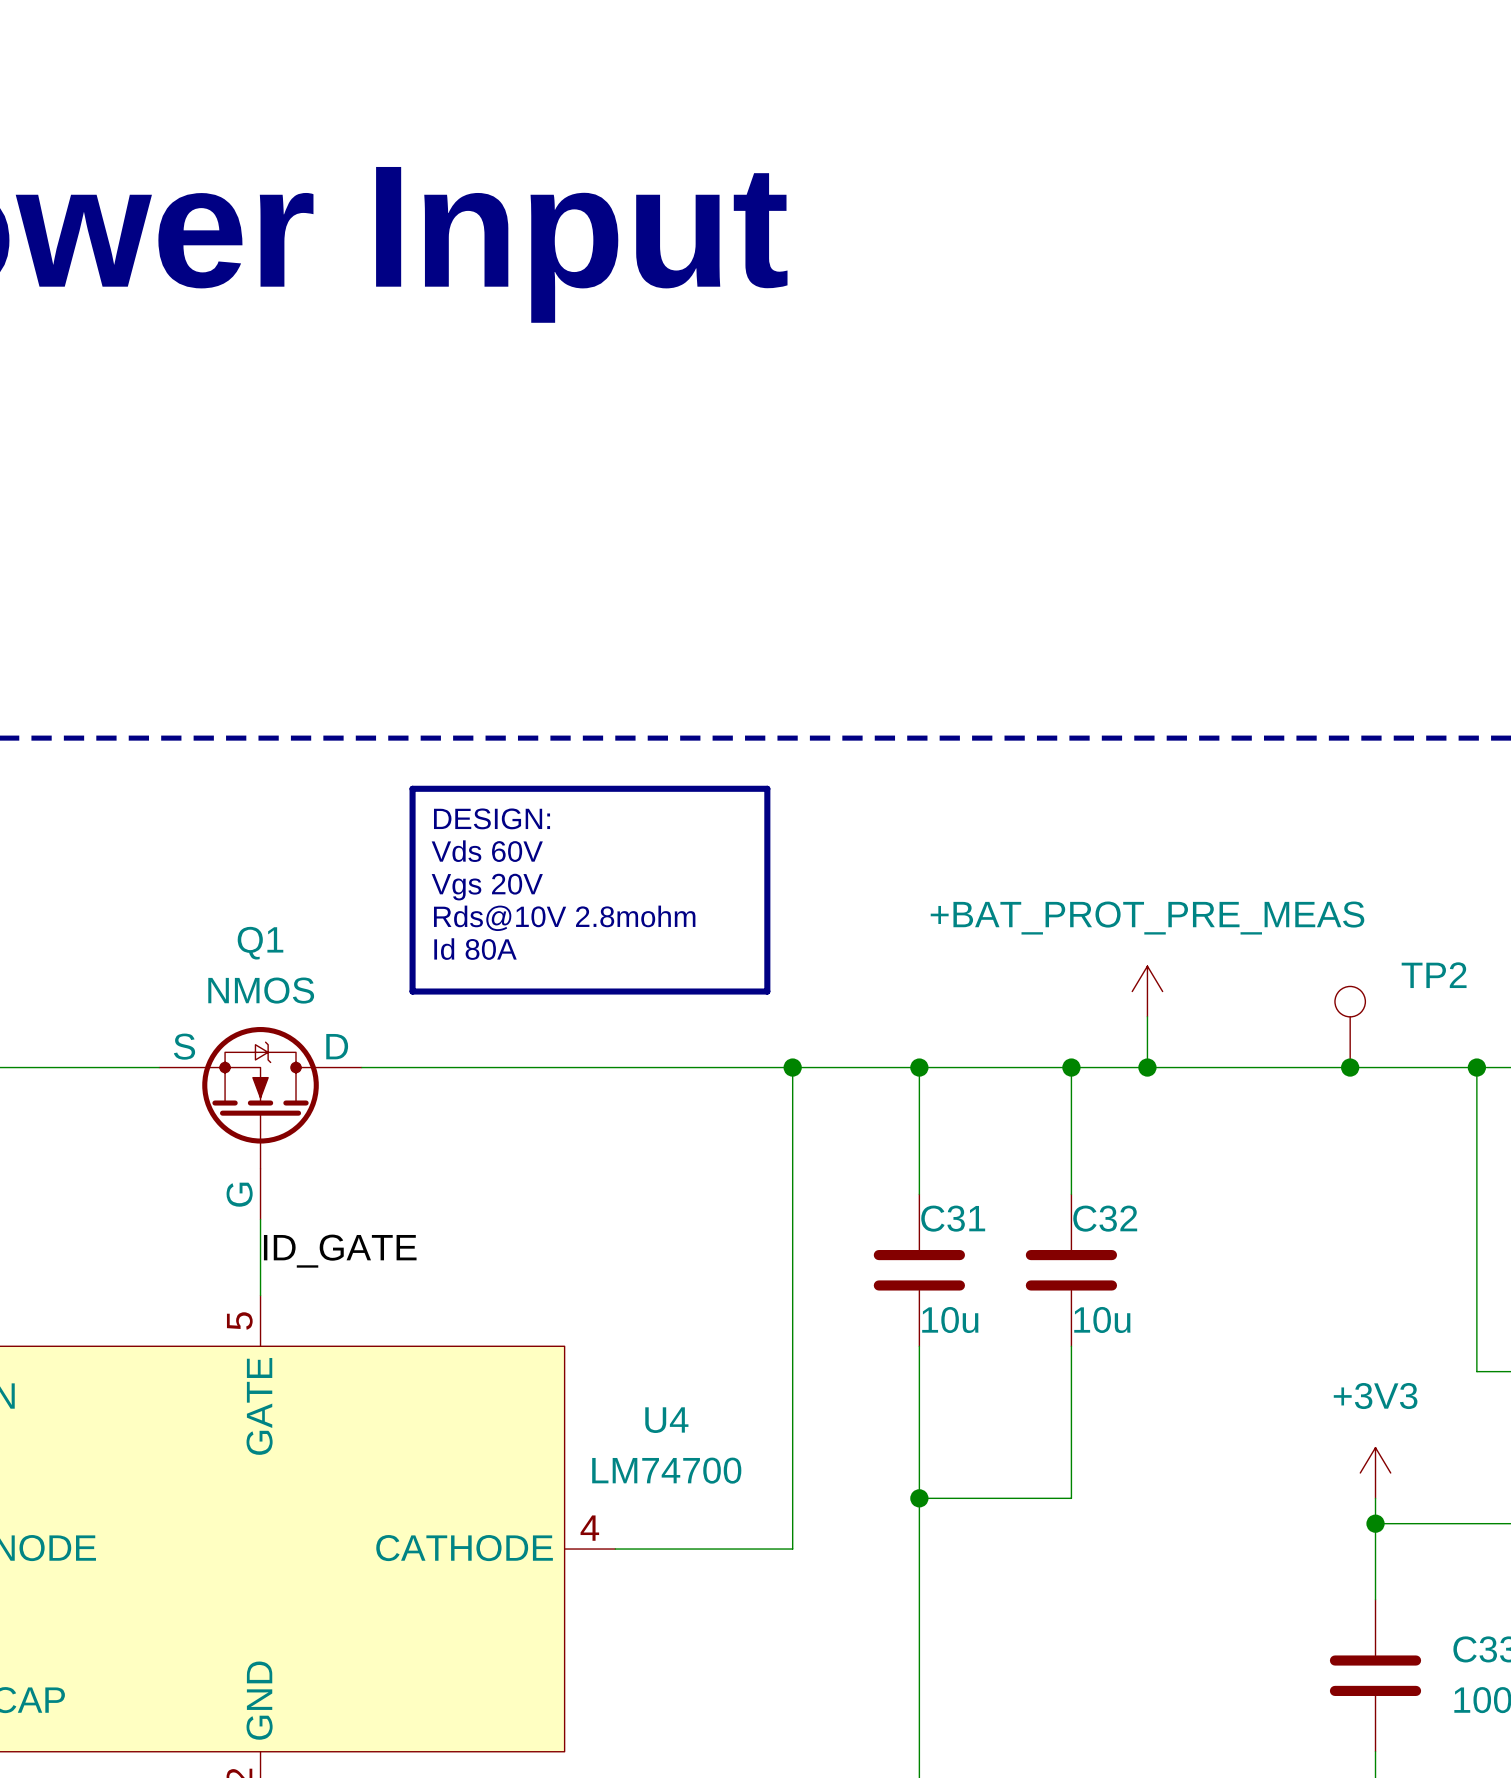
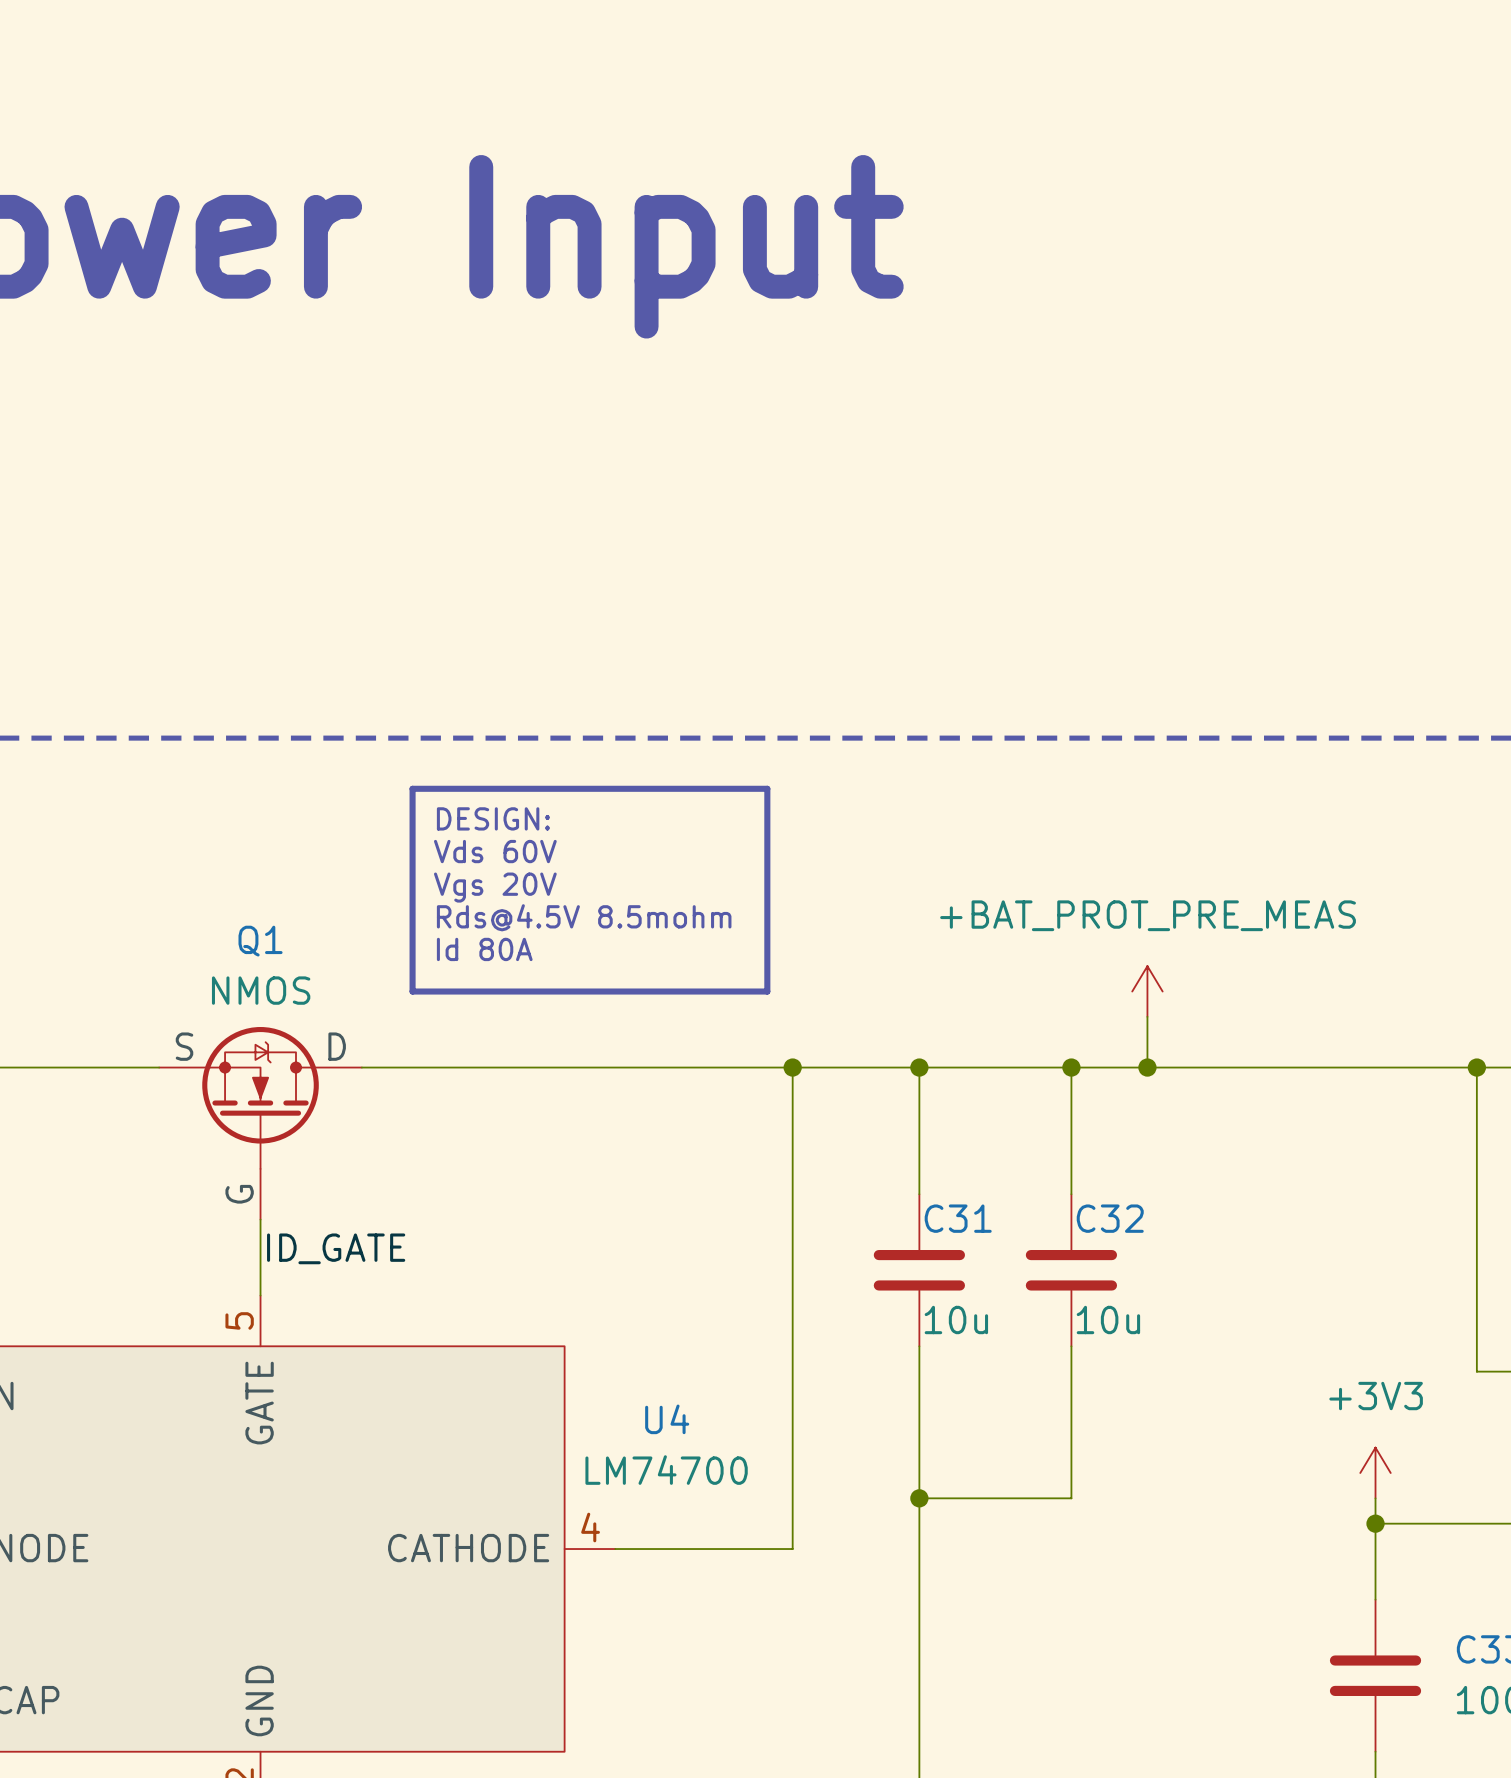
text: Rds@10V 2.8mohm (564, 918) -> Rds@4.5V 8.5mohm (584, 917)
TP2: (1350, 1027) -> none
junction: (1350, 1067) -> none

